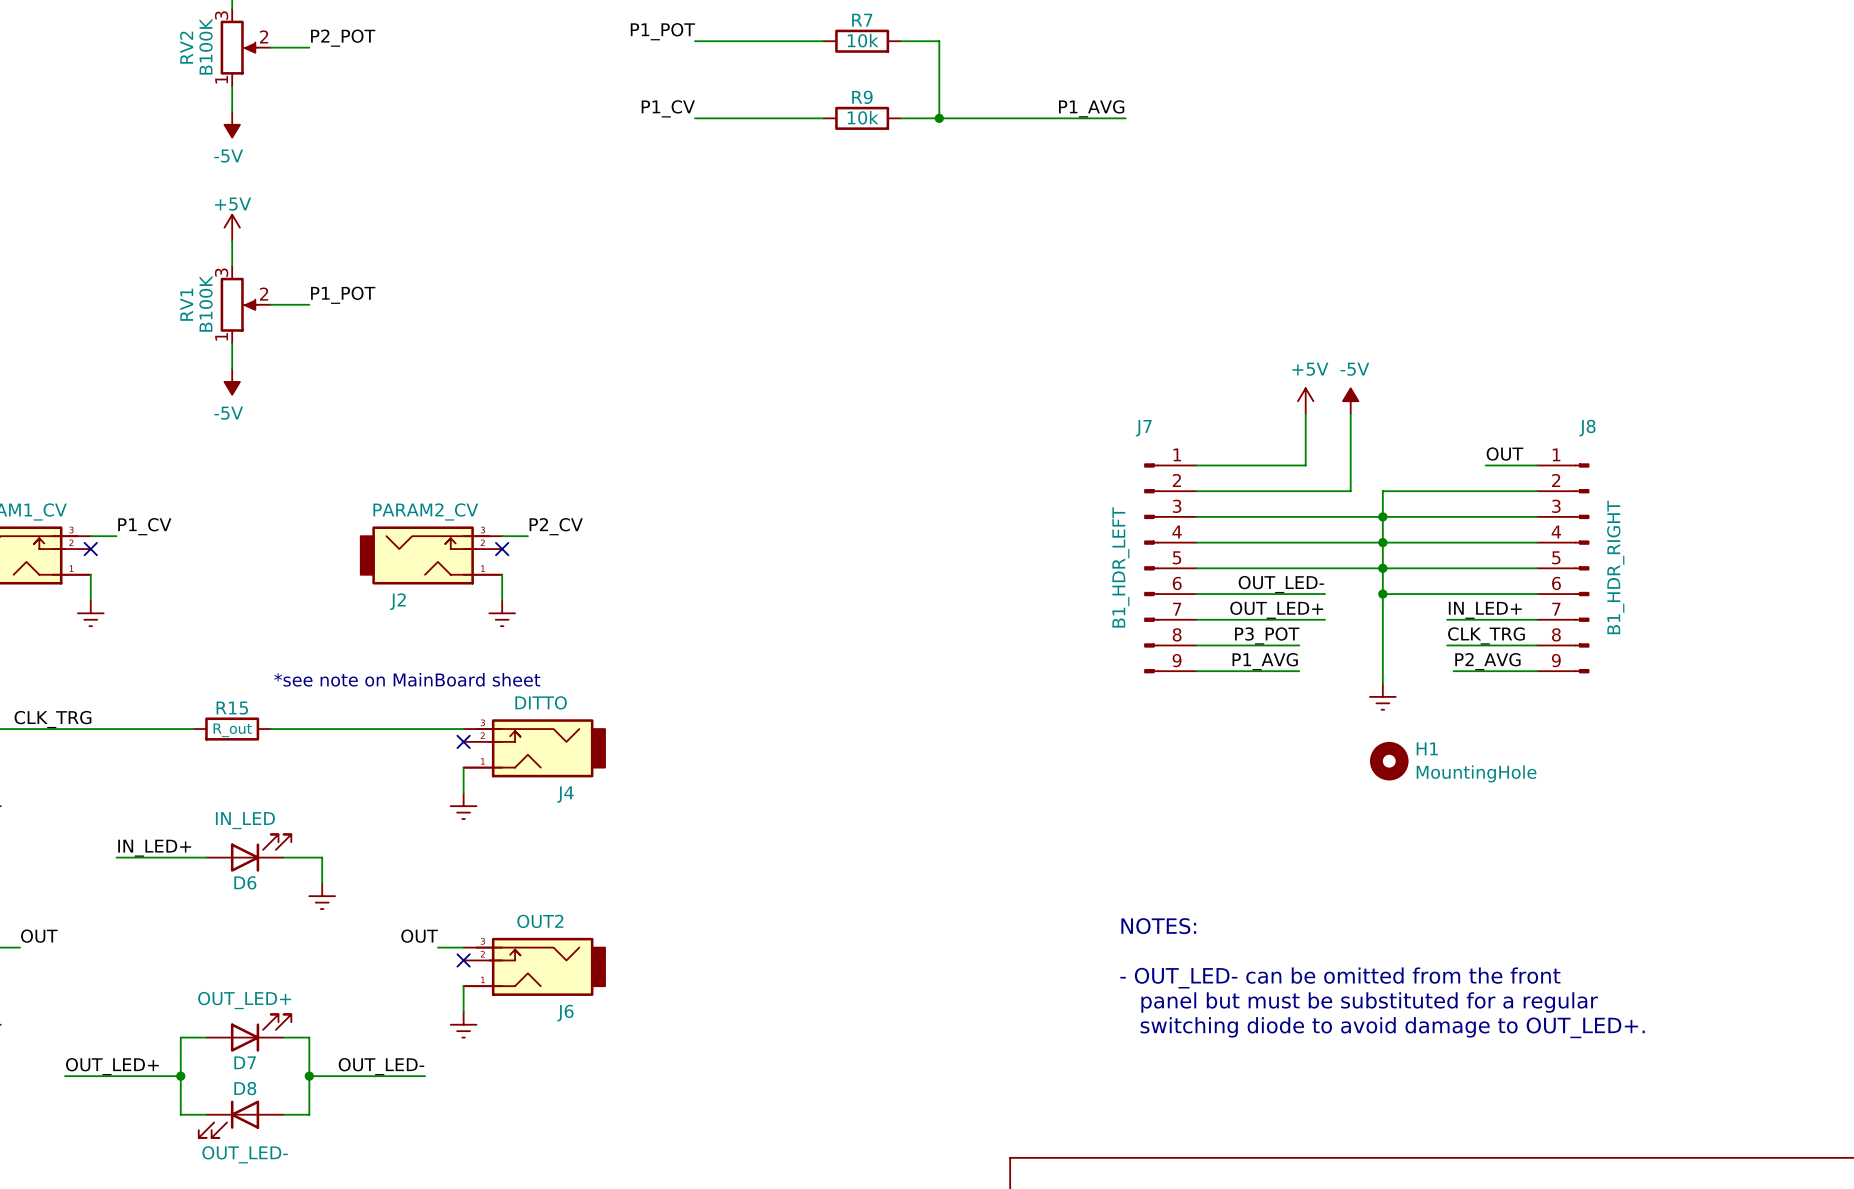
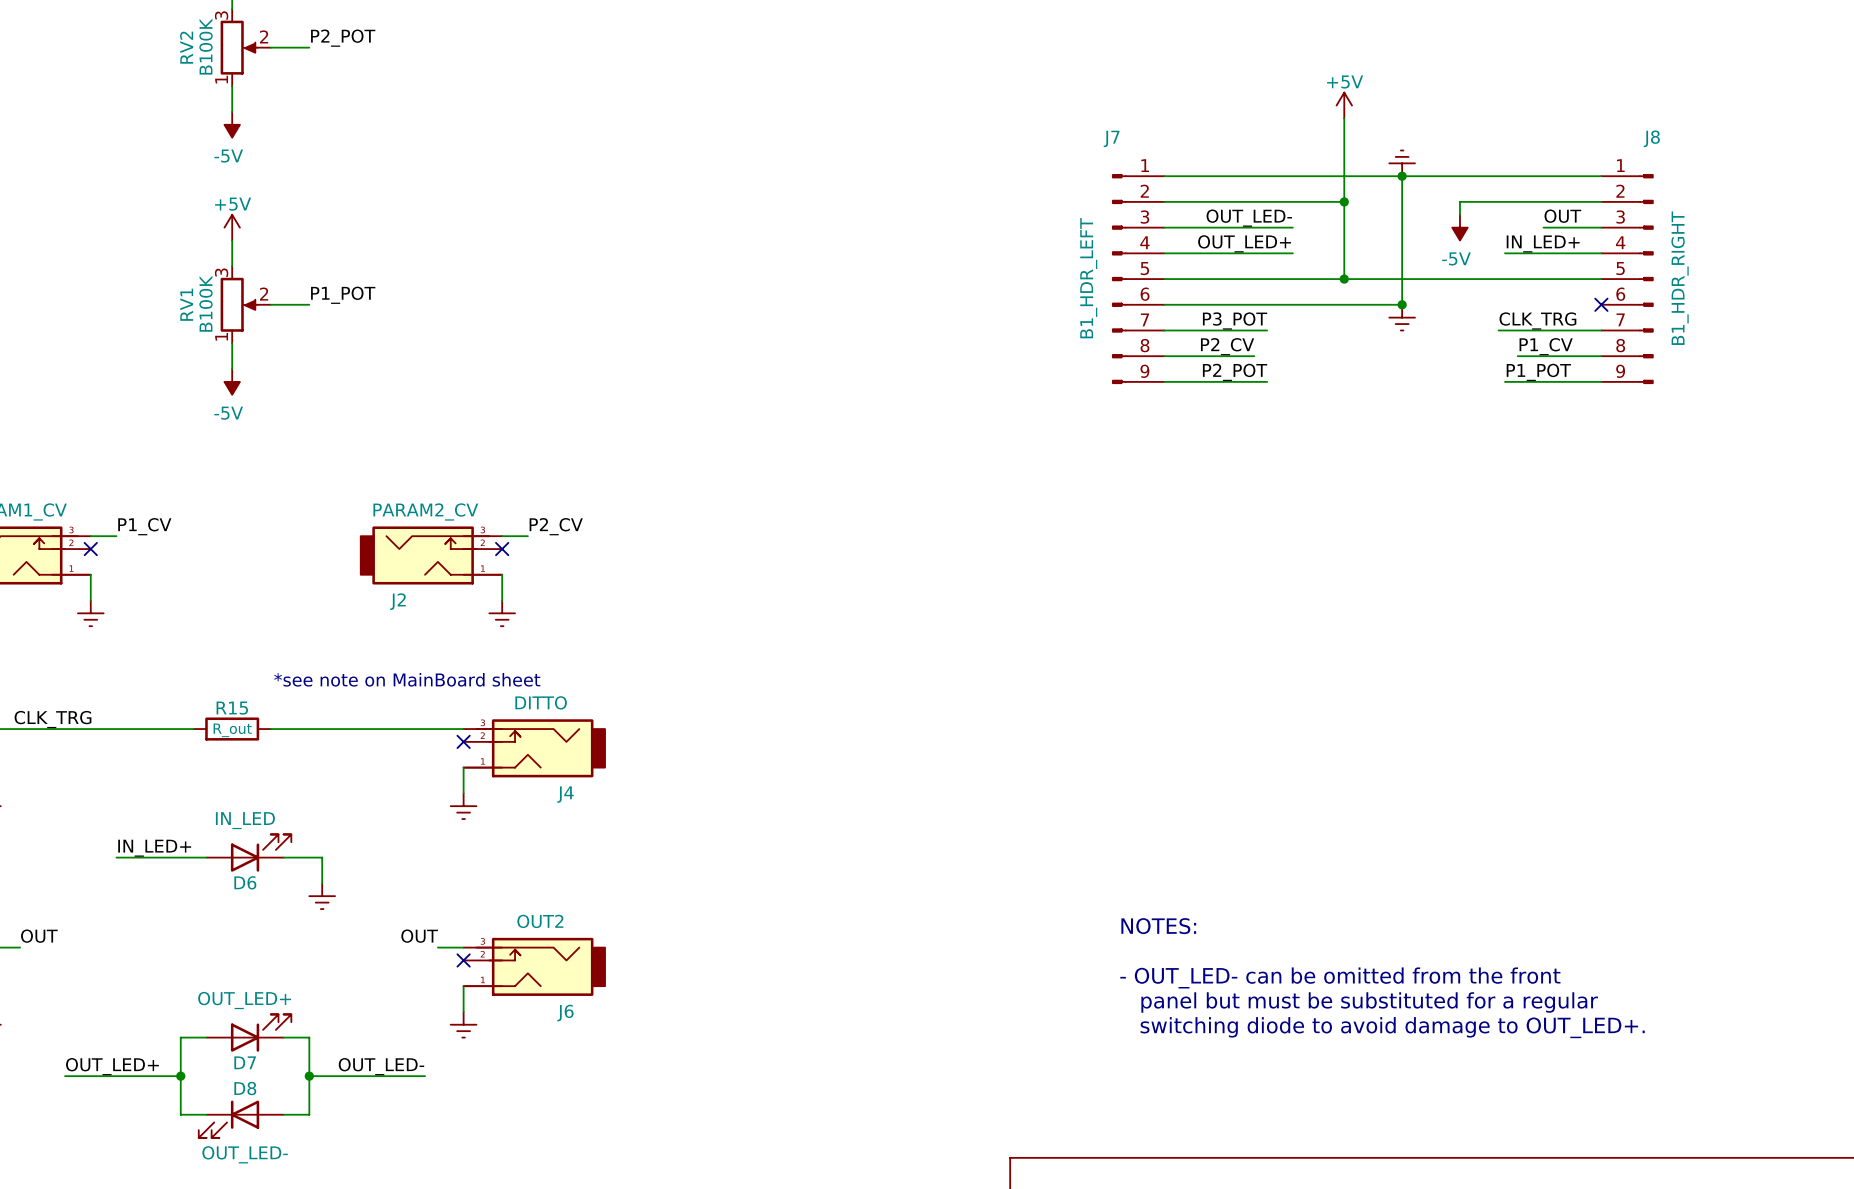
label: P1_POT (662, 31) -> none
wire: (695, 41) (823, 41) -> none
R7: 10k (862, 41) -> none
wire: (900, 41) (939, 41) (939, 118) -> none
power symbol: none -> +5V (1344, 105)
label: P1_CV (668, 108) -> none
label: P1_AVG (1091, 108) -> none
wire: (695, 118) (823, 118) -> none
R9: 10k (862, 118) -> none
wire: (900, 118) (1125, 118) -> none
junction: (939, 118) -> none
wire: none -> (1344, 118) (1344, 279)
power symbol: none -> (1402, 163)
wire: none -> (1164, 176) (1601, 176)
wire: none -> (1402, 176) (1402, 304) (1164, 304)
junction: none -> (1402, 176)
wire: none -> (1164, 201) (1344, 201)
junction: none -> (1344, 201)
wire: none -> (1601, 201) (1459, 201) (1459, 214)
label: none -> OUT_LED- (1249, 218)
wire: none -> (1164, 227) (1292, 227)
wire: none -> (1543, 227) (1601, 227)
label: none -> OUT_LED+ (1244, 243)
label: none -> IN_LED+ (1543, 243)
wire: none -> (1164, 253) (1292, 253)
wire: none -> (1504, 253) (1601, 253)
wire: none -> (1164, 279) (1601, 279)
junction: none -> (1344, 279)
junction: none -> (1402, 304)
no-connect mark: none -> (1601, 304)
power symbol: none -> (1402, 317)
label: none -> P3_POT (1235, 320)
label: none -> CLK_TRG (1537, 320)
wire: none -> (1164, 330) (1267, 330)
wire: none -> (1498, 330) (1601, 330)
label: none -> P2_CV (1227, 346)
label: none -> P1_CV (1546, 346)
wire: none -> (1164, 356) (1254, 356)
wire: none -> (1517, 356) (1601, 356)
label: none -> P2_POT (1235, 372)
label: none -> P1_POT (1538, 372)
wire: none -> (1164, 381) (1267, 381)
wire: none -> (1504, 381) (1601, 381)
power symbol: +5V (1305, 401) -> none
power symbol rotation: 0° (1350, 401) -> 180° (1459, 227)
power symbol position: -5V (1350, 401) -> -5V (1459, 227)
wire: (1305, 414) (1305, 465) (1196, 465) -> none
wire: (1350, 414) (1350, 491) (1196, 491) -> none
label position: OUT (1504, 454) -> OUT (1562, 216)
wire: (1485, 465) (1537, 465) -> none
wire: (1537, 491) (1382, 491) (1382, 684) -> none
wire: (1196, 516) (1537, 516) -> none
junction: (1382, 516) -> none
wire: (1196, 542) (1537, 542) -> none
junction: (1382, 542) -> none
J7 position: (1170, 568) -> (1138, 279)
wire: (1196, 568) (1537, 568) -> none
junction: (1382, 568) -> none
J8 position: (1563, 568) -> (1627, 279)
label: OUT_LED- (1281, 584) -> none
wire: (1196, 594) (1324, 594) -> none
wire: (1382, 594) (1537, 594) -> none
junction: (1382, 594) -> none
label: OUT_LED+ (1276, 610) -> none
label: IN_LED+ (1485, 610) -> none
wire: (1196, 619) (1324, 619) -> none
wire: (1447, 619) (1537, 619) -> none
label: P3_POT (1267, 635) -> none
label: CLK_TRG (1486, 635) -> none
wire: (1196, 645) (1299, 645) -> none
wire: (1447, 645) (1537, 645) -> none
label: P1_AVG (1265, 661) -> none
label: P2_AVG (1487, 661) -> none
wire: (1196, 671) (1299, 671) -> none
wire: (1453, 671) (1537, 671) -> none
power symbol: (1382, 696) -> none
H1: MountingHole (1389, 761) -> none

